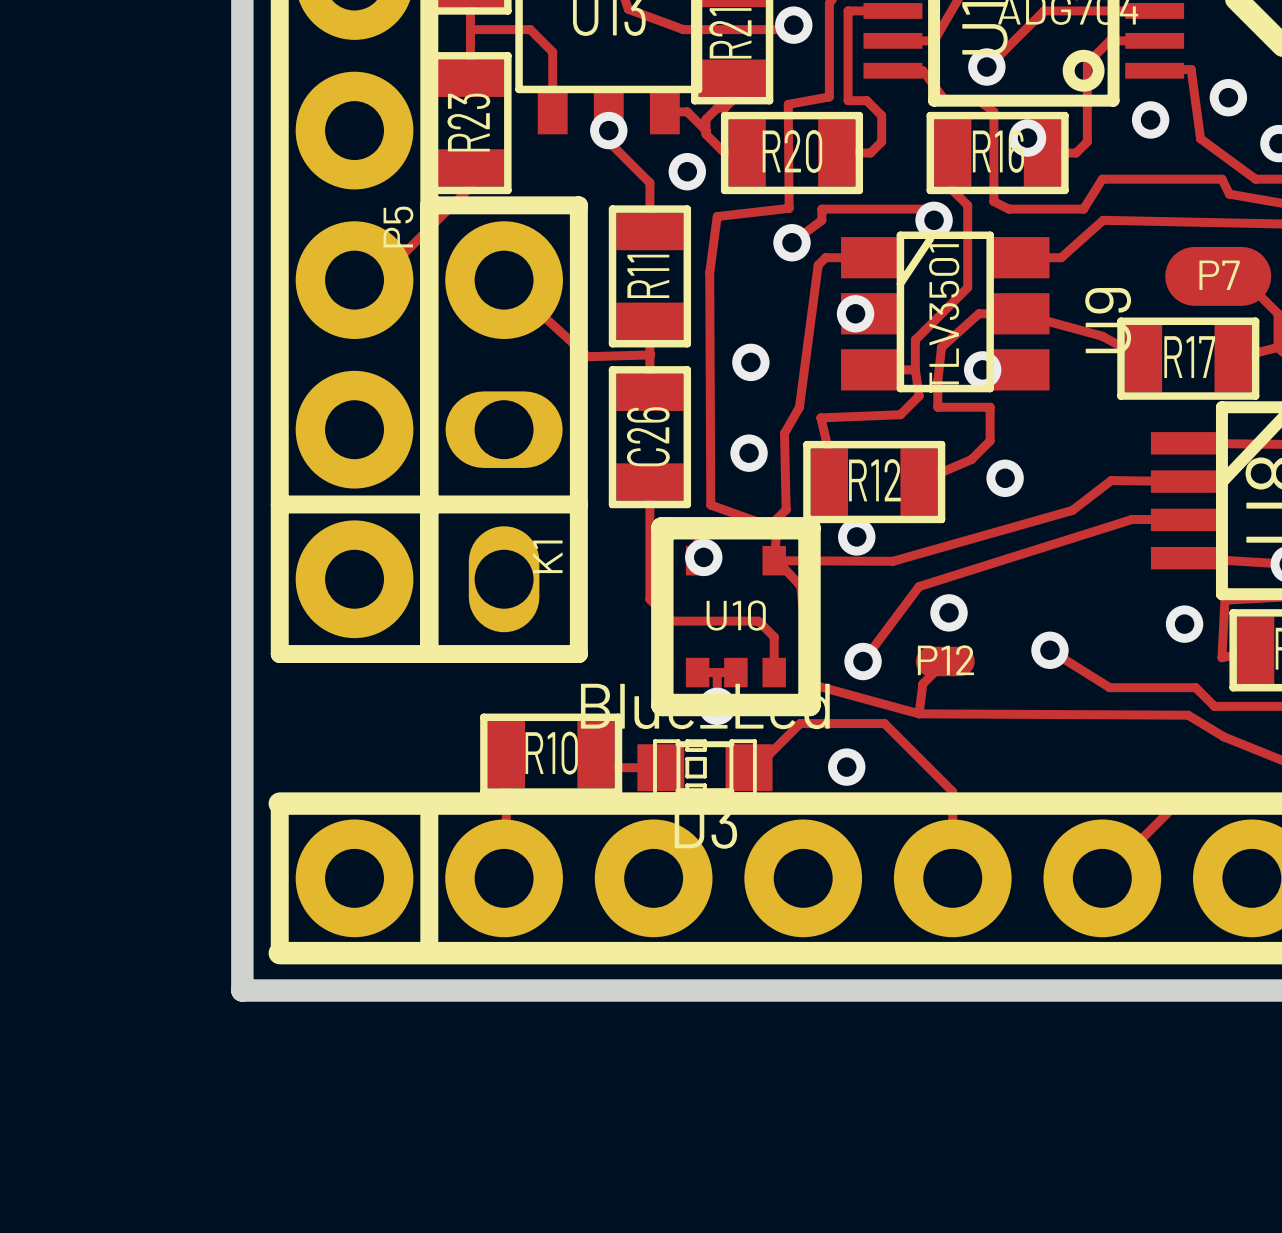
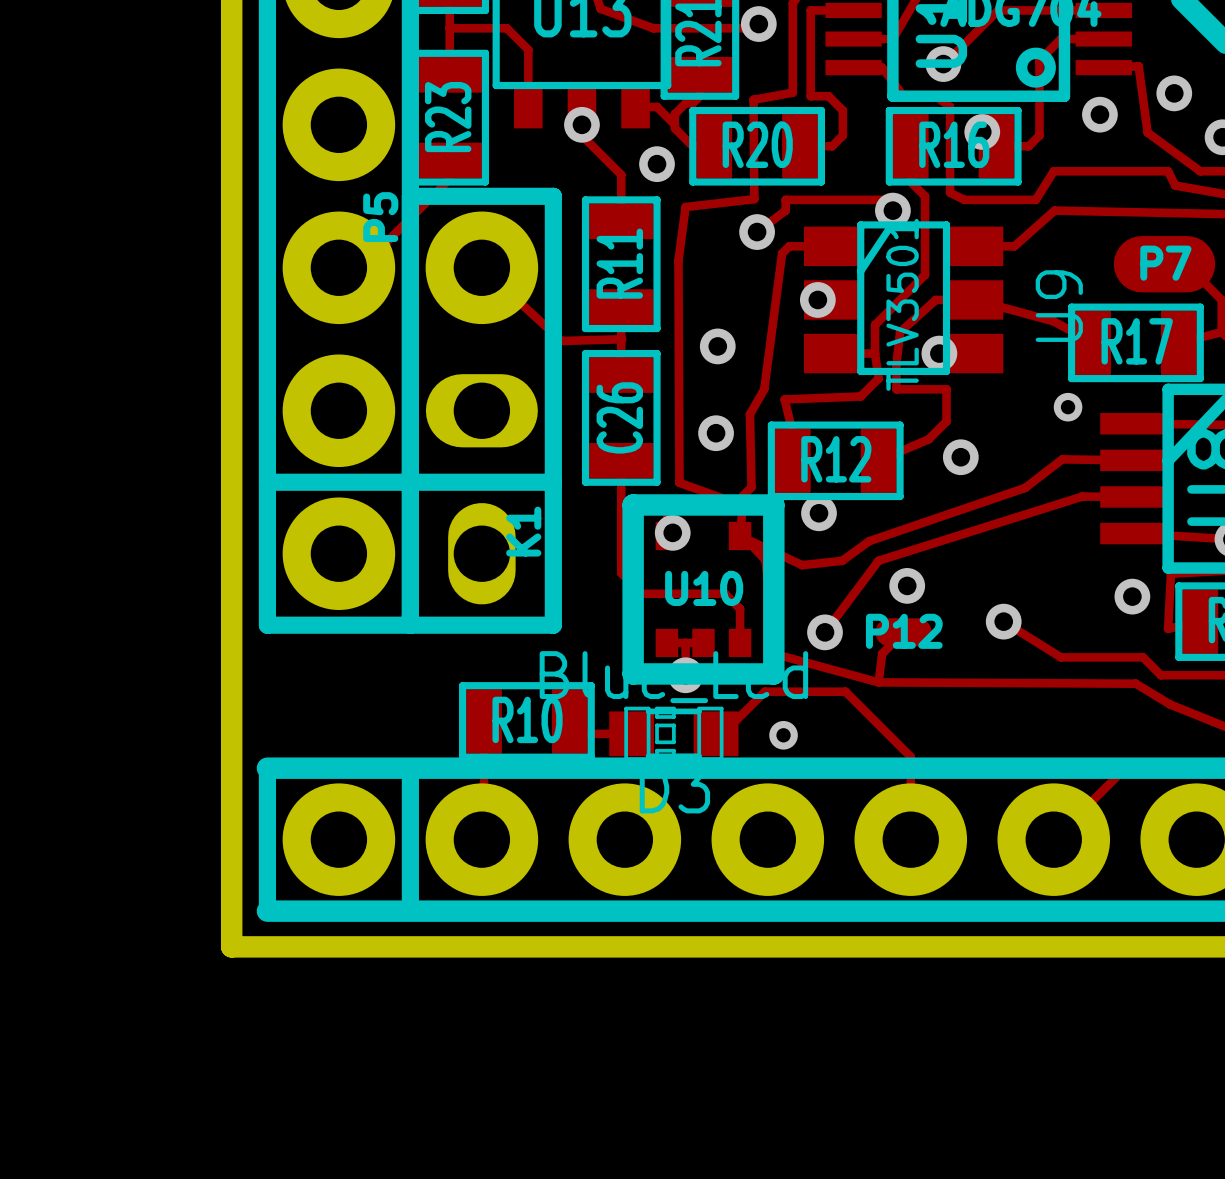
via: none -> (1068, 407)
track: (1072, 510) (892, 561) (774, 560) -> (1025, 487) (869, 541) (842, 560) (802, 565) (740, 536)
via position: (846, 767) -> (783, 735)

